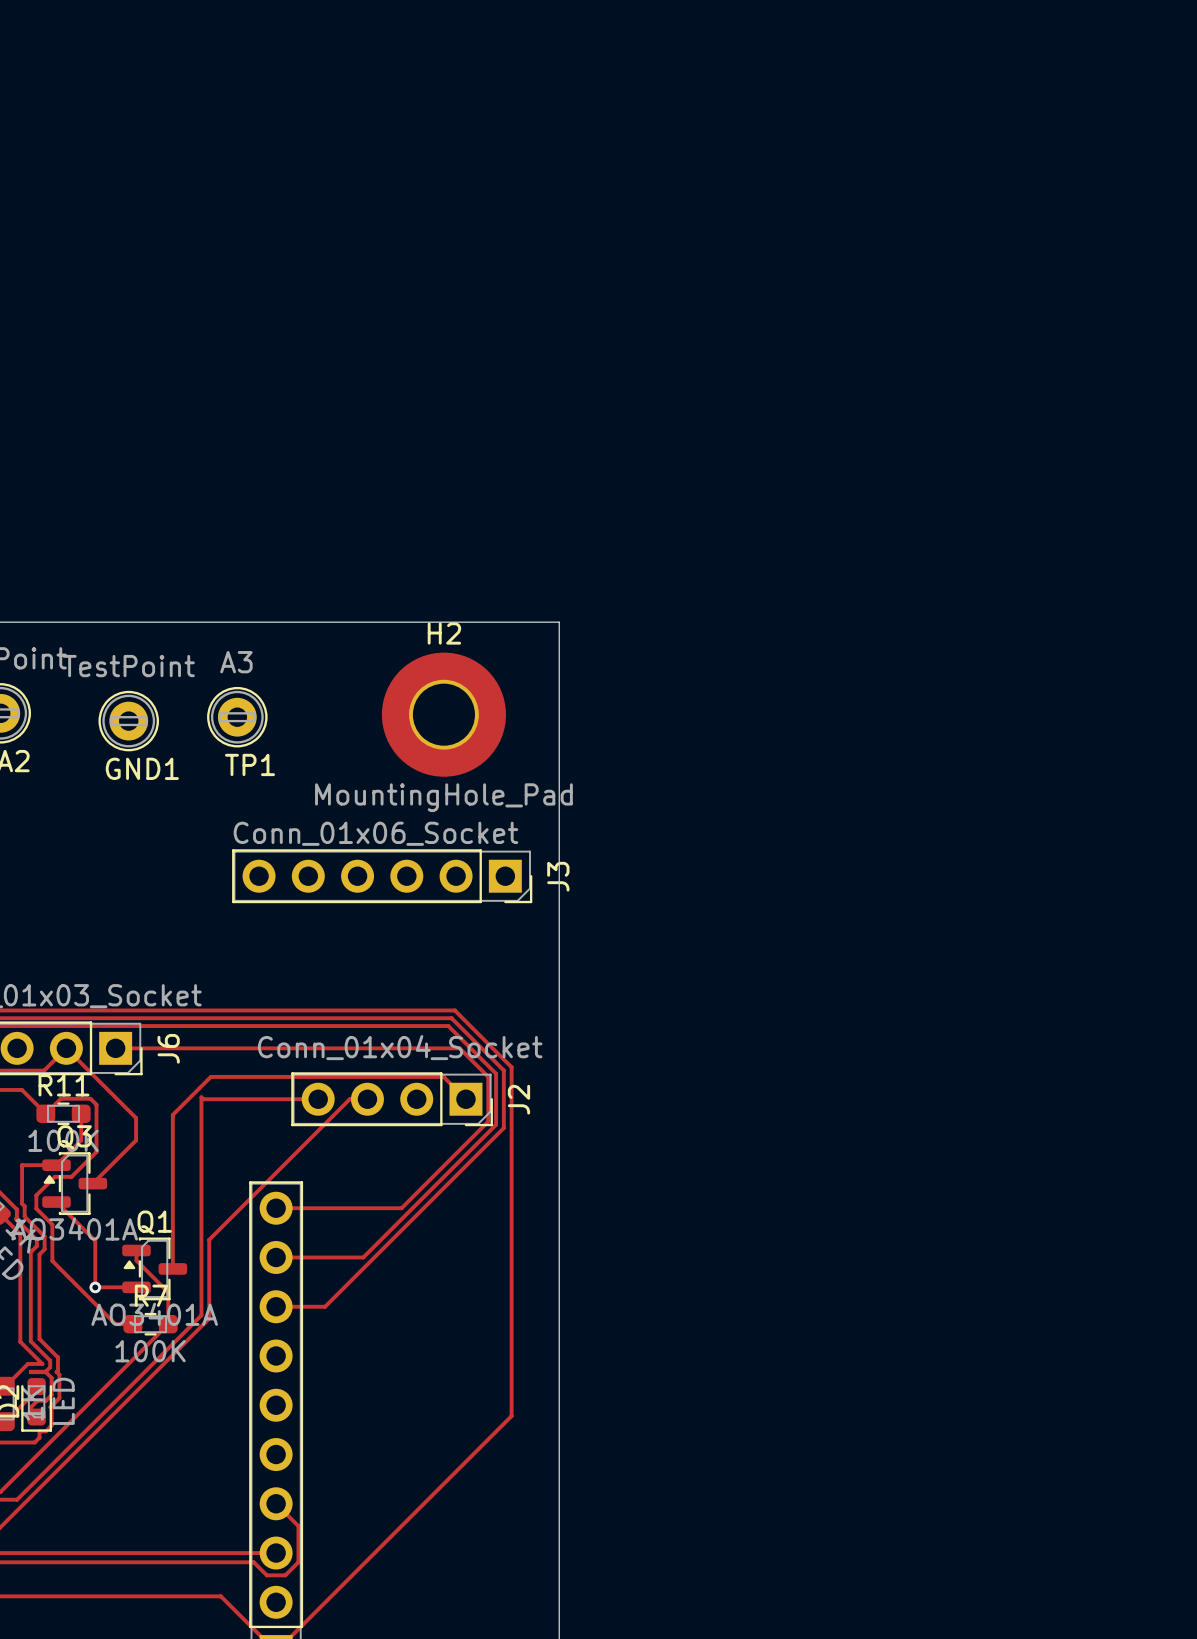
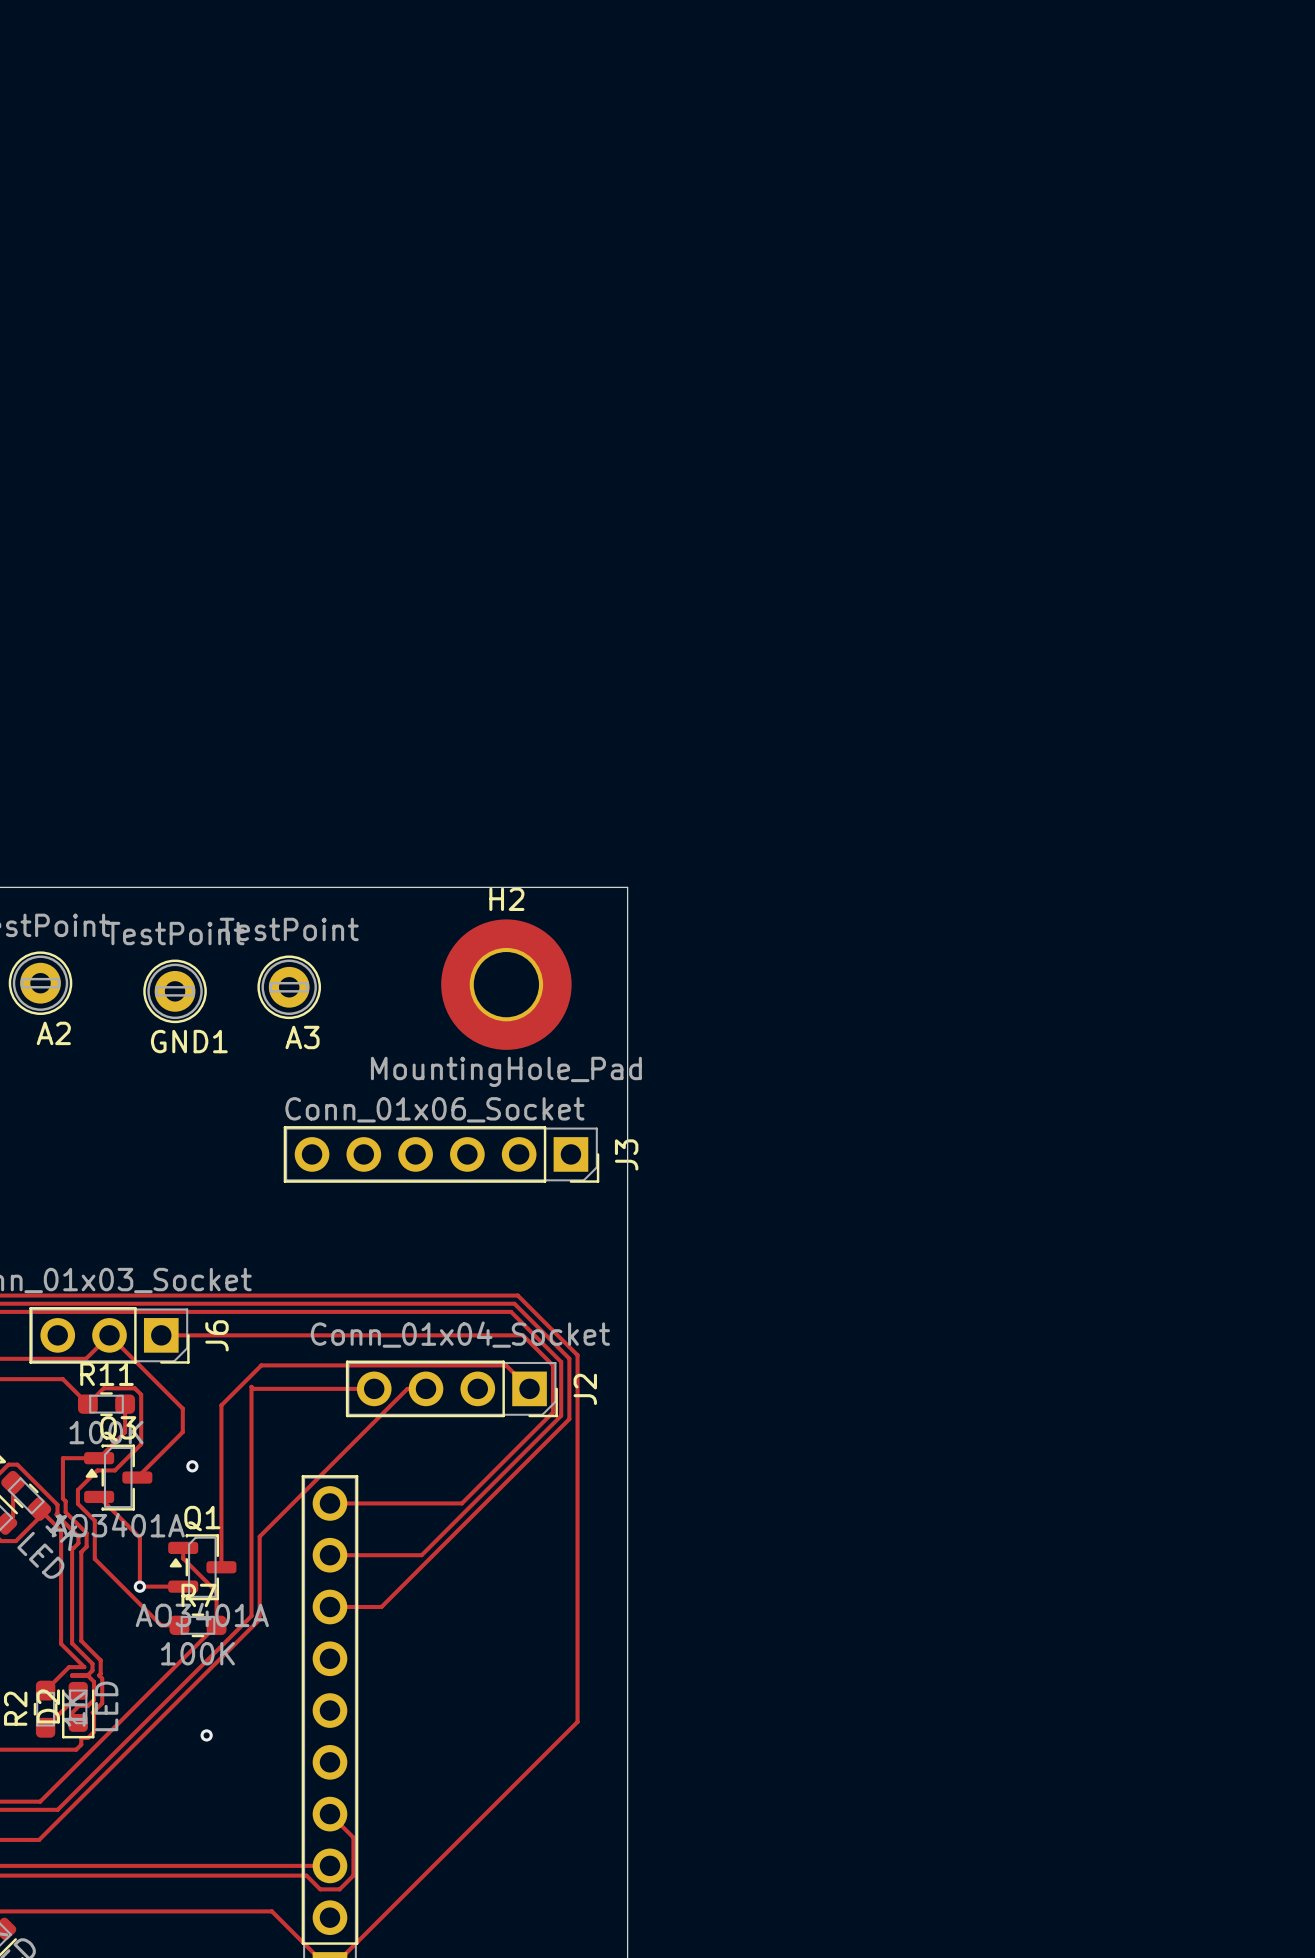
TP1 value: A3 (236, 662) -> TestPoint (289, 929)
TP1 name: TP1 (249, 764) -> A3 (302, 1037)
via: none -> (192, 1466)
via: none -> (206, 1735)

